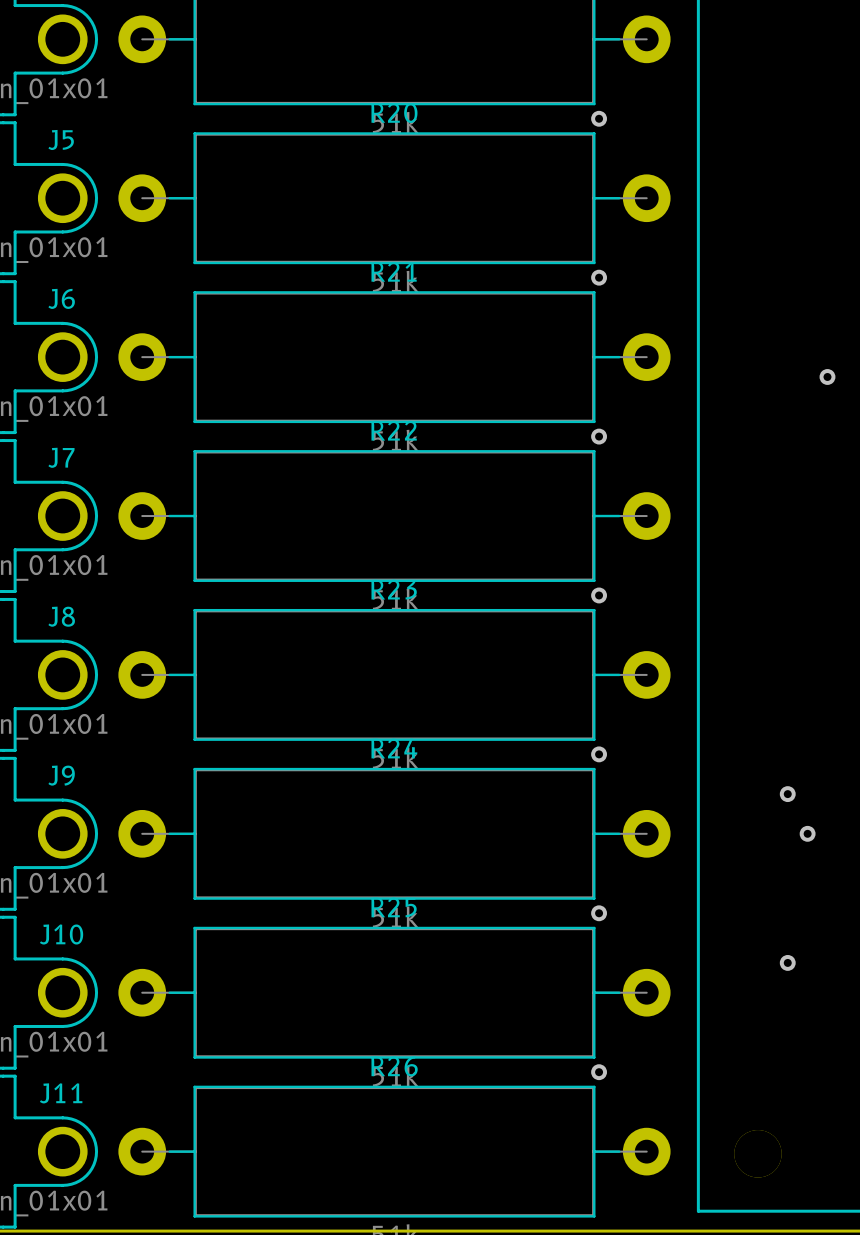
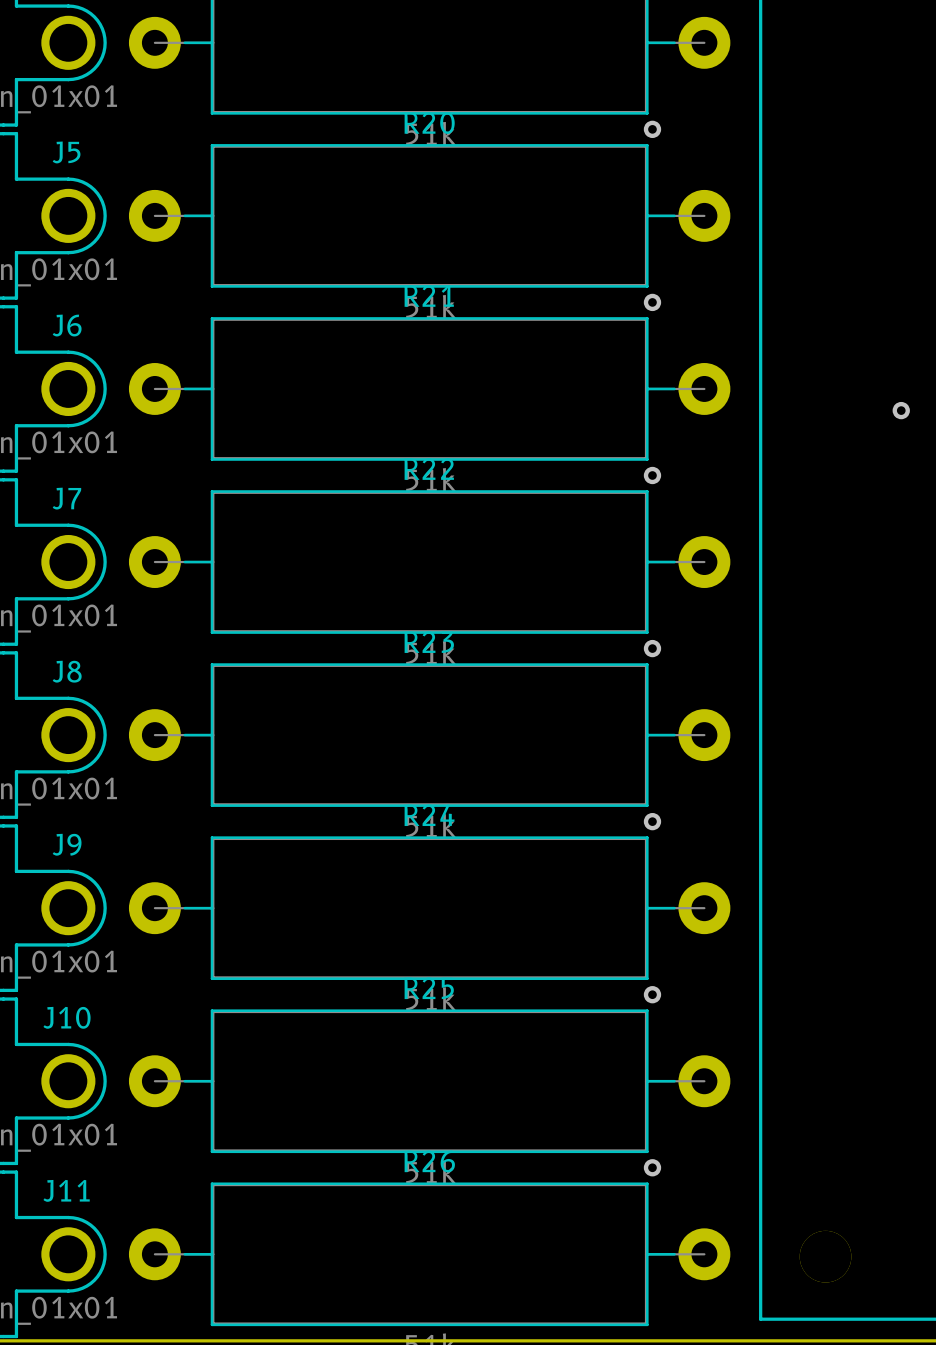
via: (787, 794) -> none
via: (807, 833) -> none
via: (787, 962) -> none

